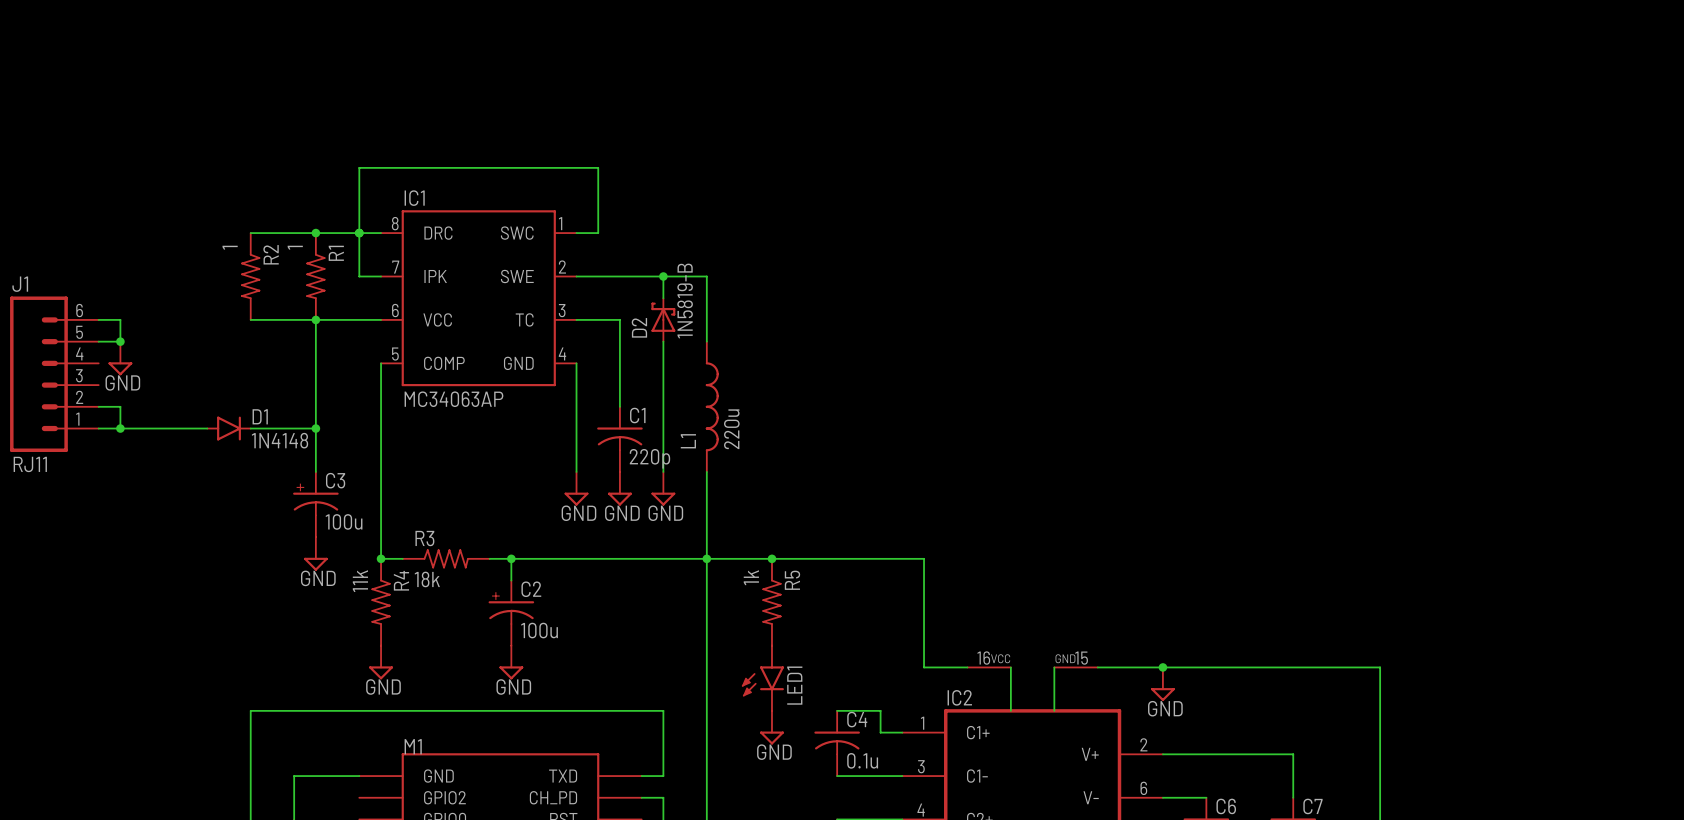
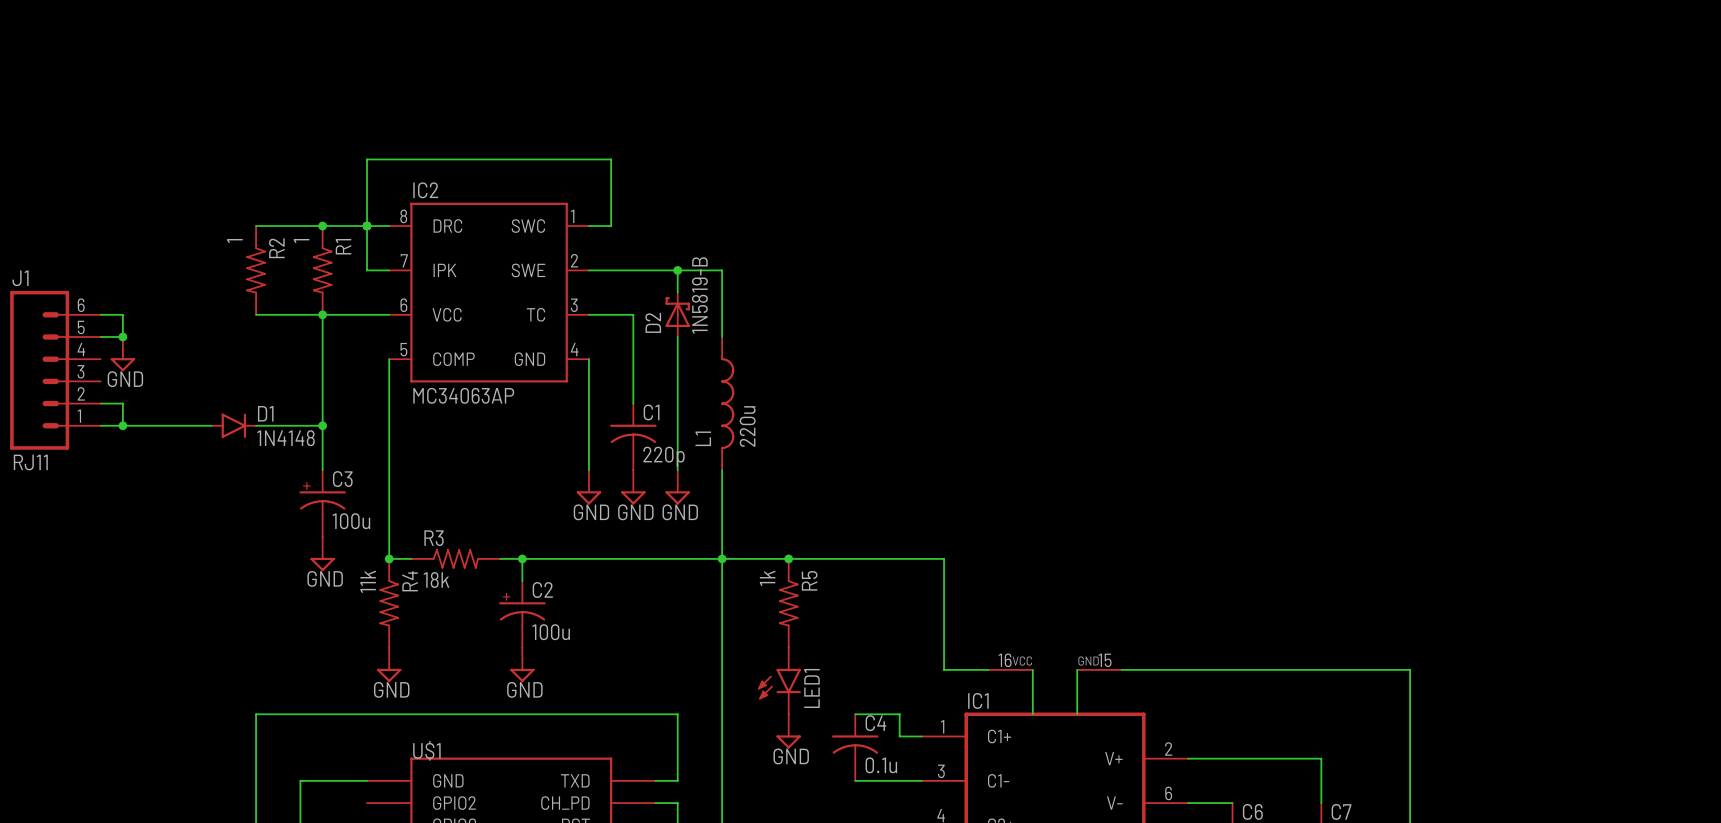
IC1 name: IC1 (414, 198) -> IC2 (425, 190)
junction: (1162, 667) -> none
power symbol: GND (1162, 684) -> none
IC2 name: IC2 (959, 697) -> IC1 (978, 700)
M1 name: M1 (413, 746) -> U$1 (426, 750)

